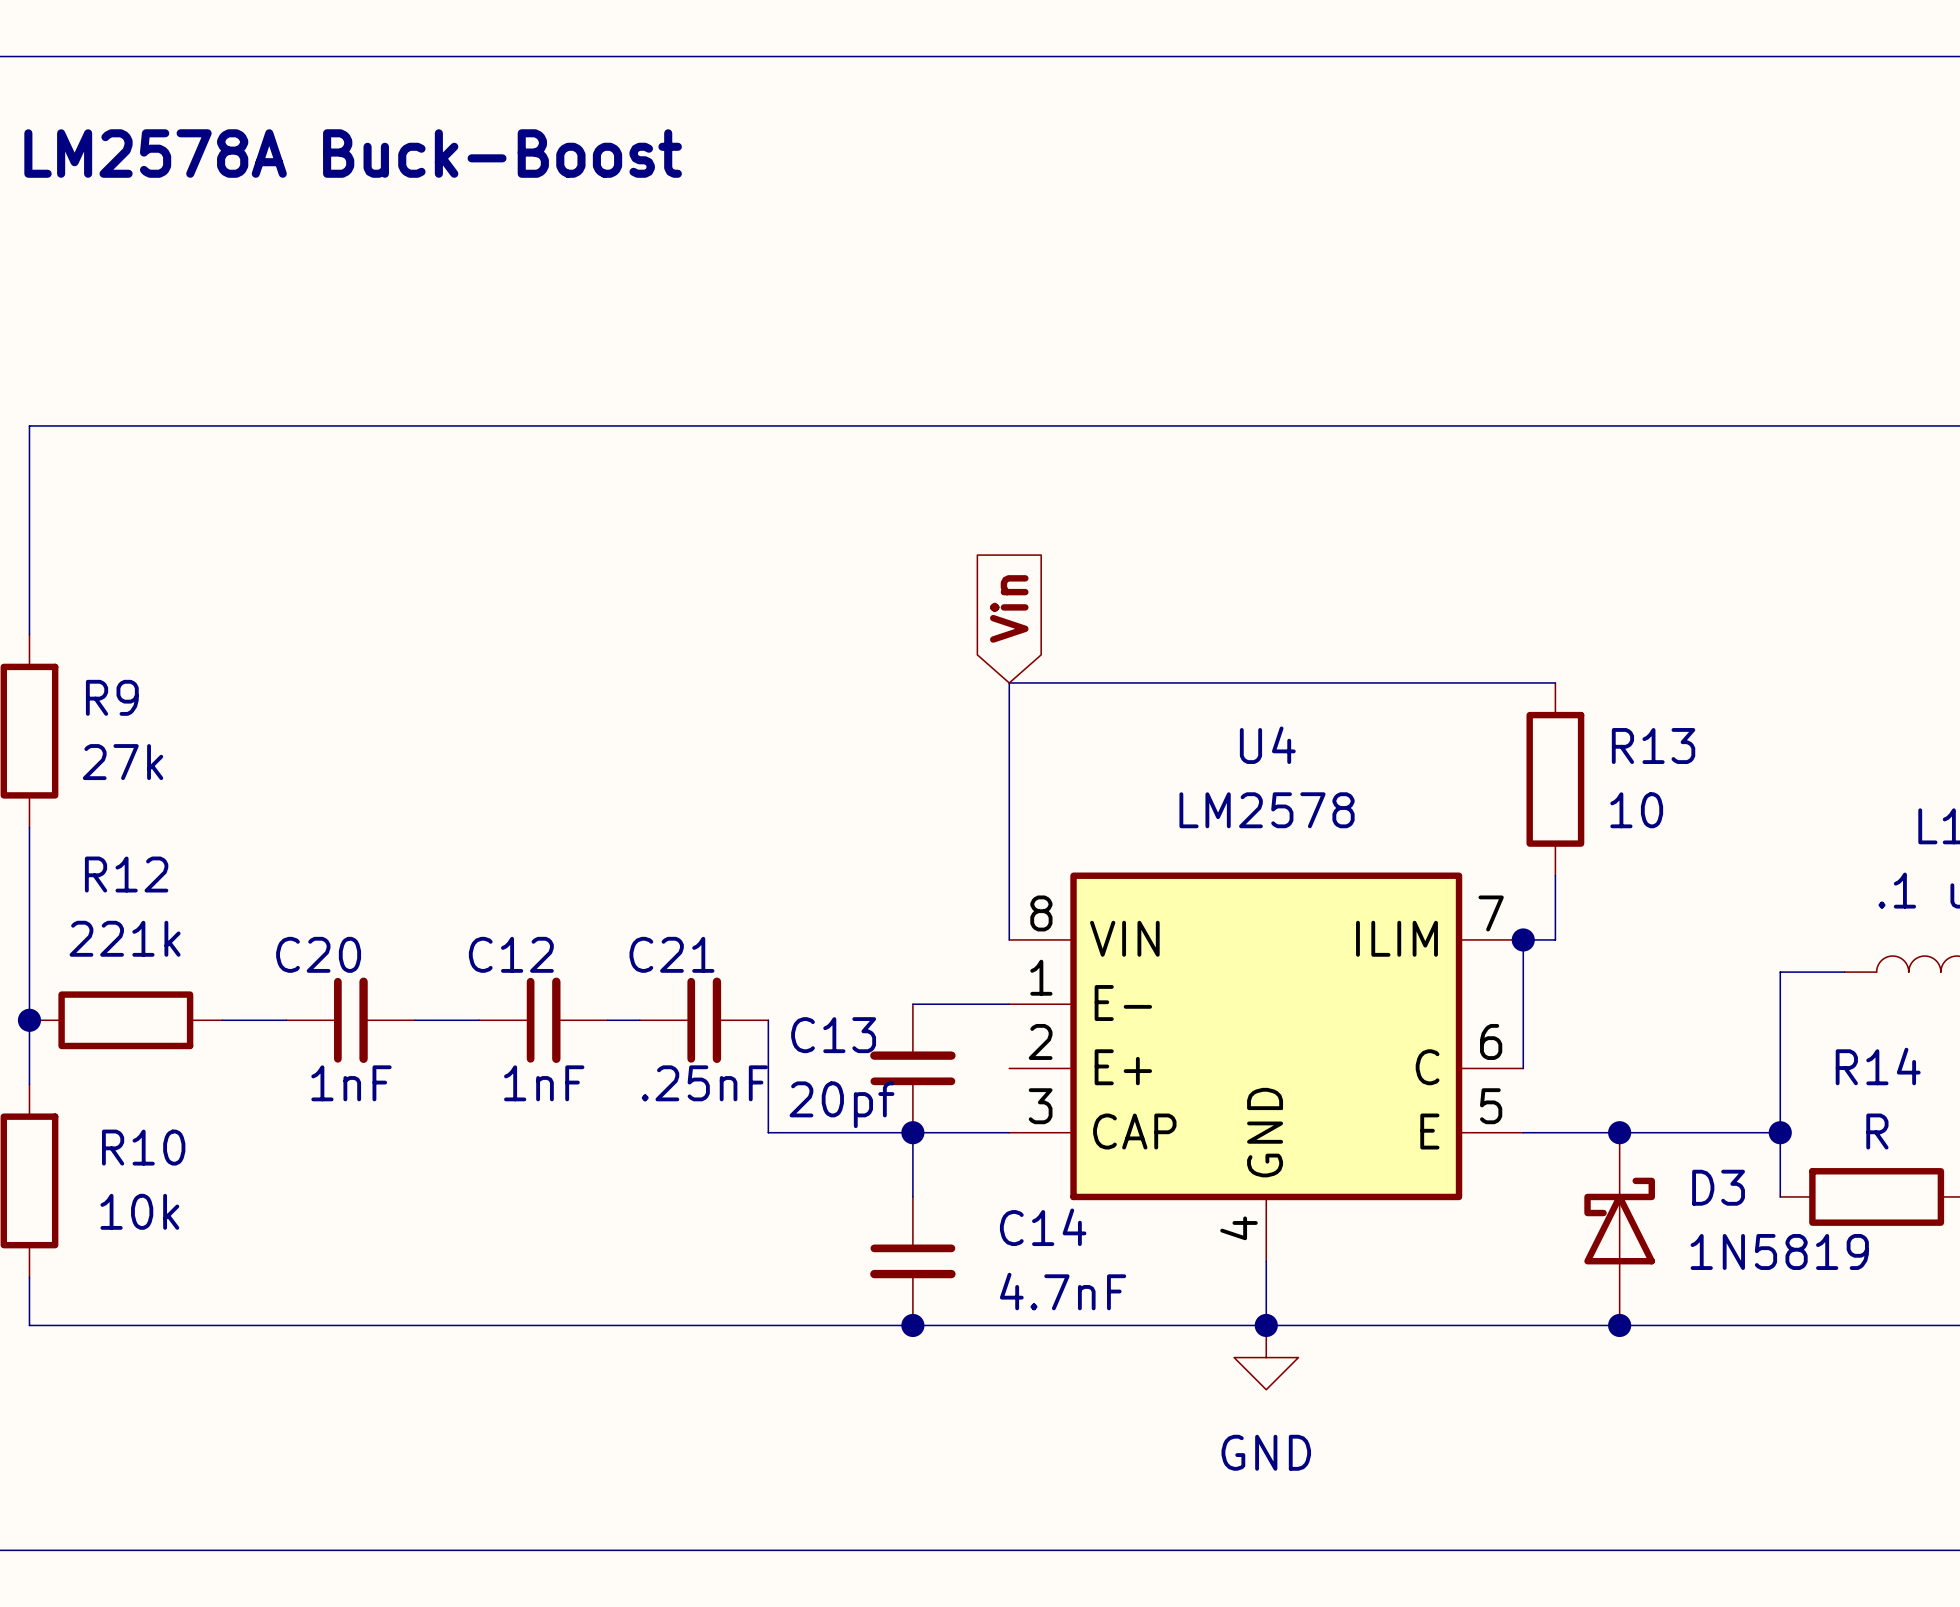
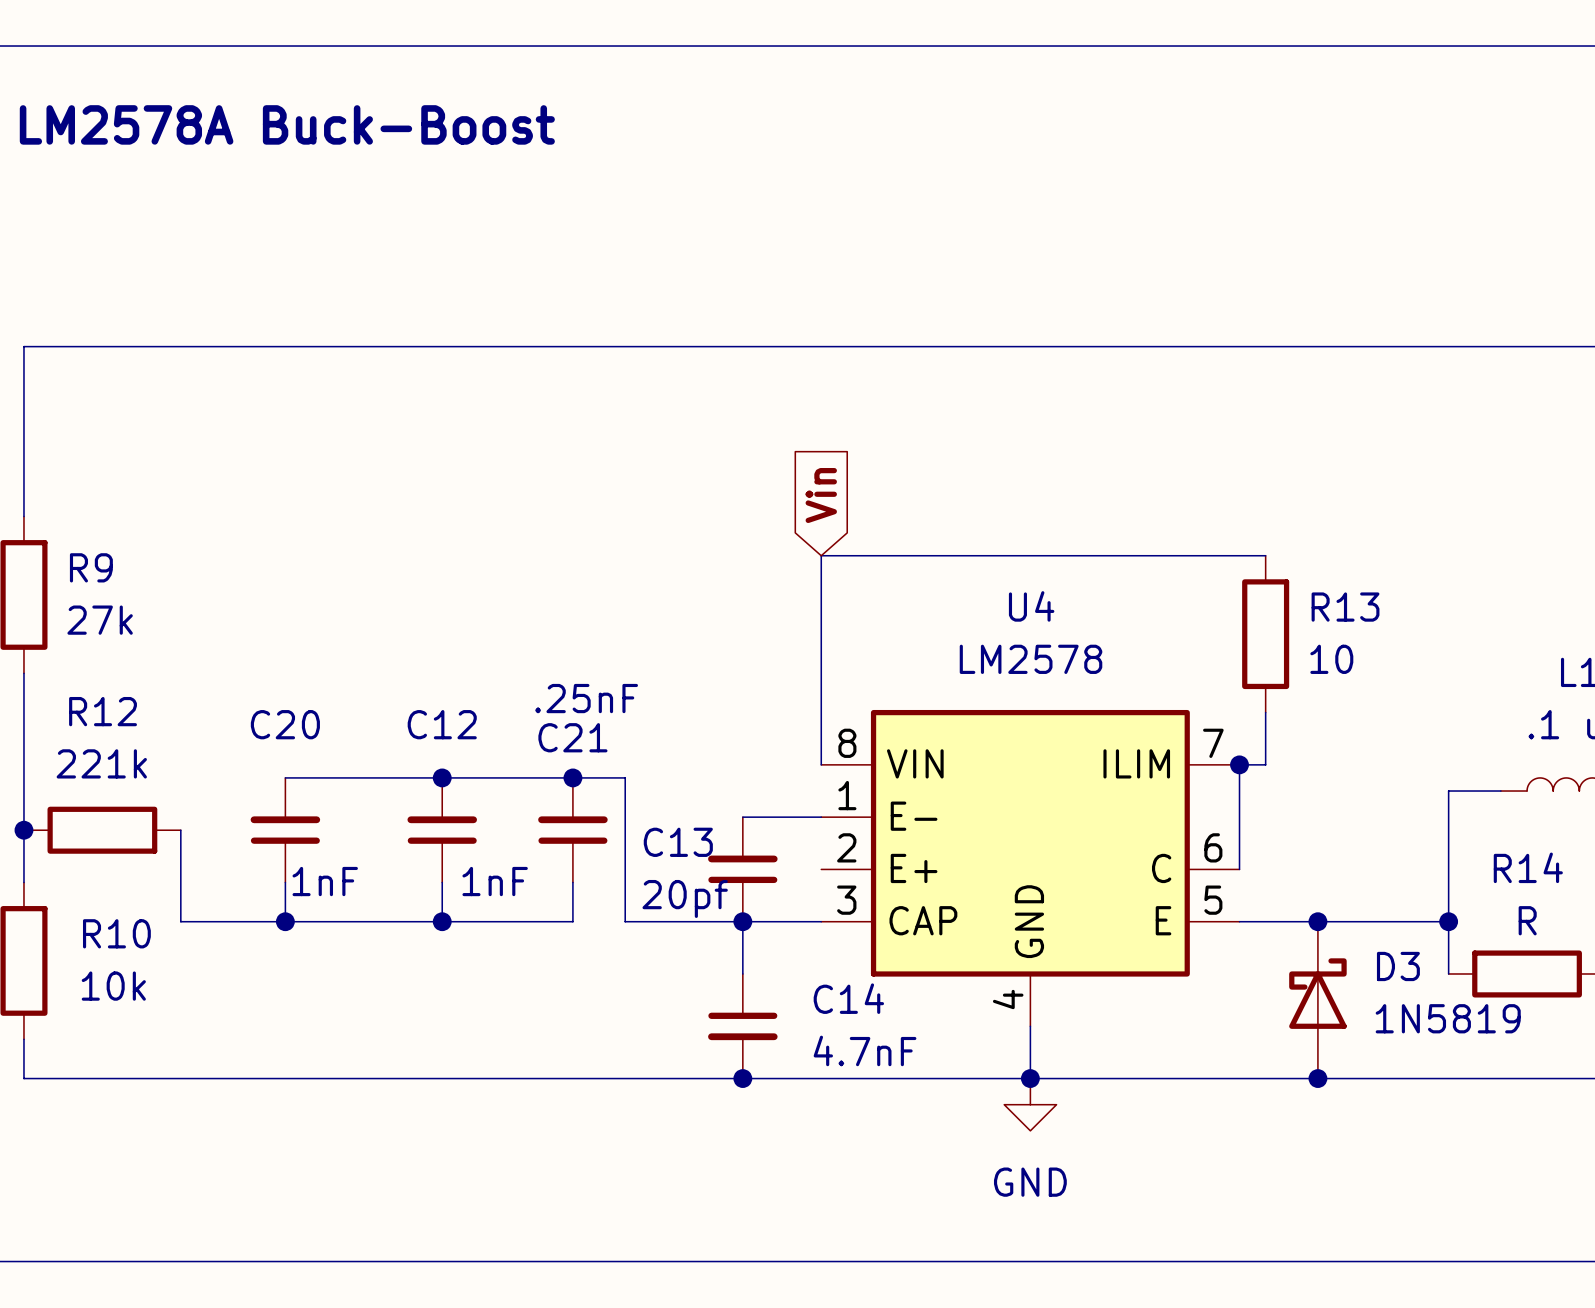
C20 name position: C20 (318, 954) -> C20 (285, 724)
C12 name position: C12 (511, 954) -> C12 (442, 724)
C21 name position: C21 (671, 954) -> C21 (572, 737)
wire: none -> (285, 777) (625, 777) (625, 830)
junction: none -> (442, 777)
junction: none -> (572, 777)
wire: (222, 1020) (286, 1020) -> (180, 830) (180, 921) (572, 921) (572, 882)
C20 rotation: 0° (350, 1020) -> 90° counterclockwise (285, 830)
wire: (414, 1020) (479, 1020) -> none
C12 rotation: 0° (543, 1020) -> 90° counterclockwise (442, 830)
wire: (607, 1020) (639, 1020) -> none
C21 rotation: 0° (704, 1020) -> 90° counterclockwise (572, 830)
C12 value position: 1nF (544, 1083) -> 1nF (495, 881)
C21 value position: .25nF (704, 1083) -> .25nF (586, 698)
wire: none -> (285, 882) (285, 921)
wire: none -> (442, 882) (442, 921)
junction: none -> (285, 921)
junction: none -> (442, 921)

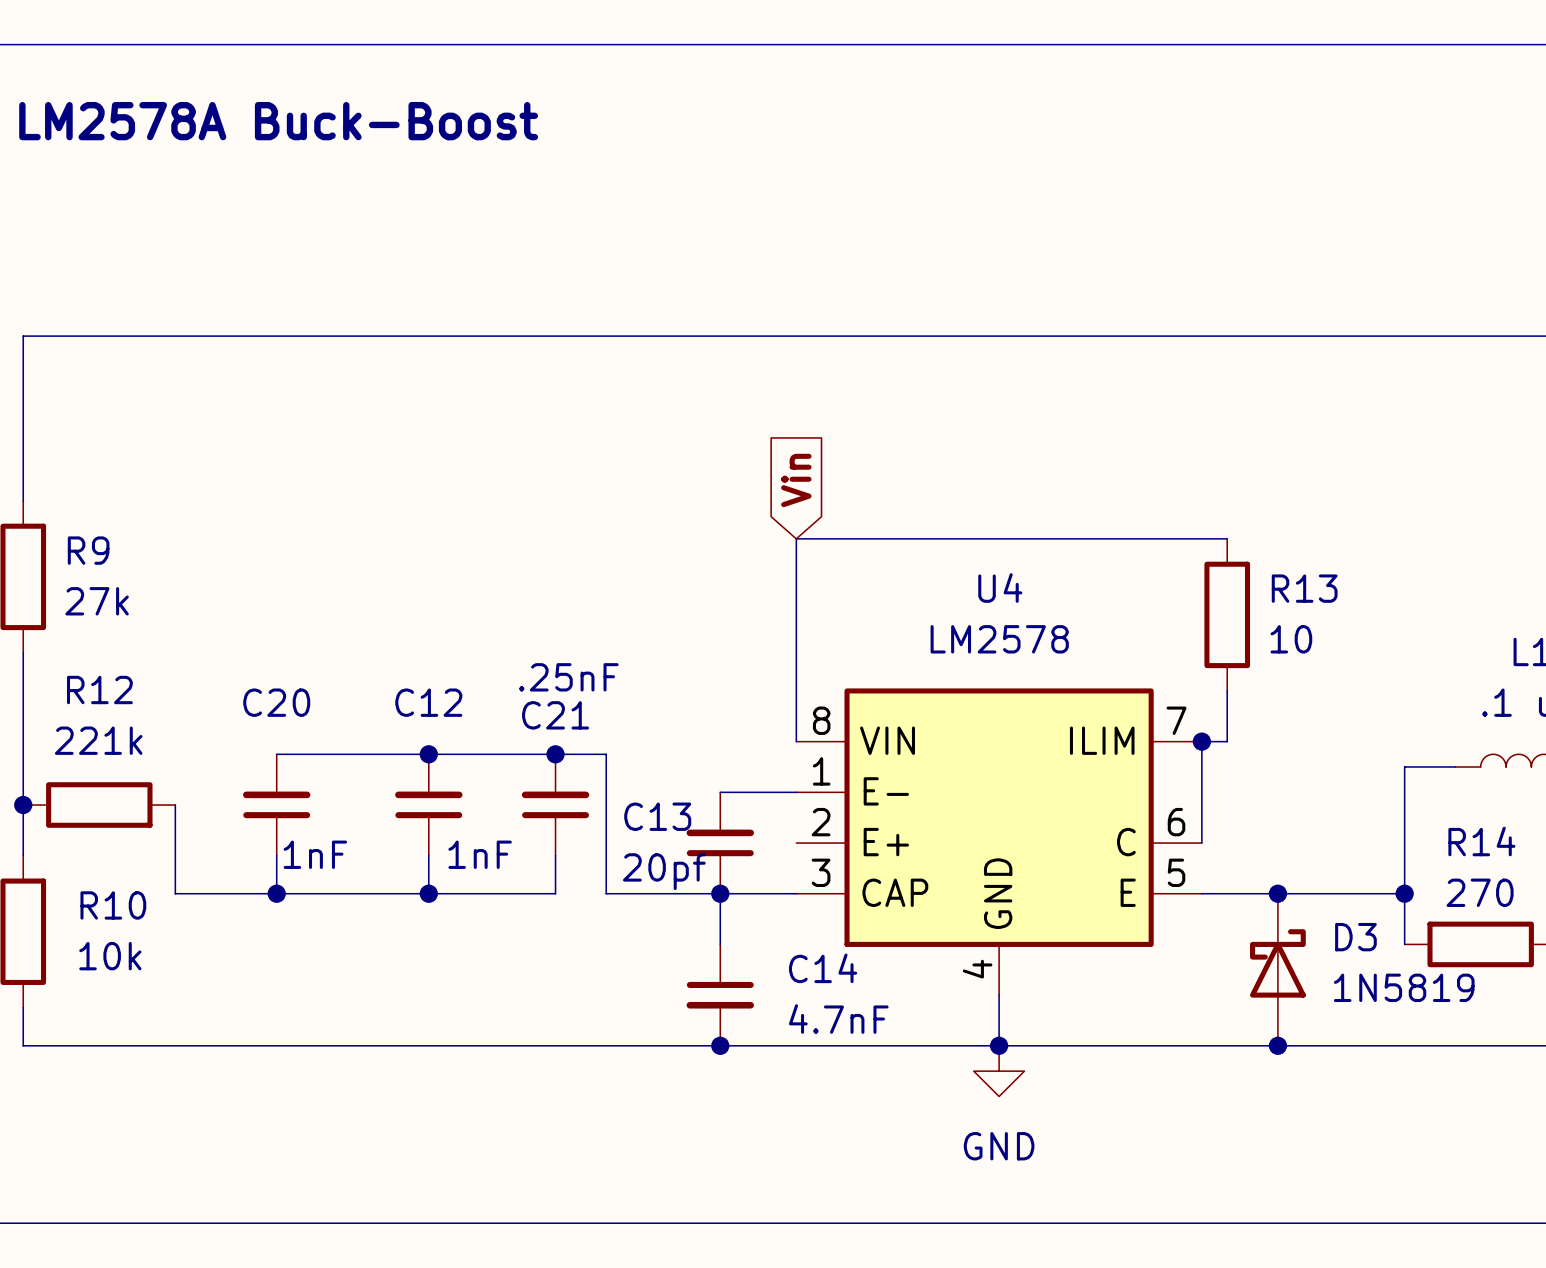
R14 value: R (1527, 920) -> 270 (1480, 892)

